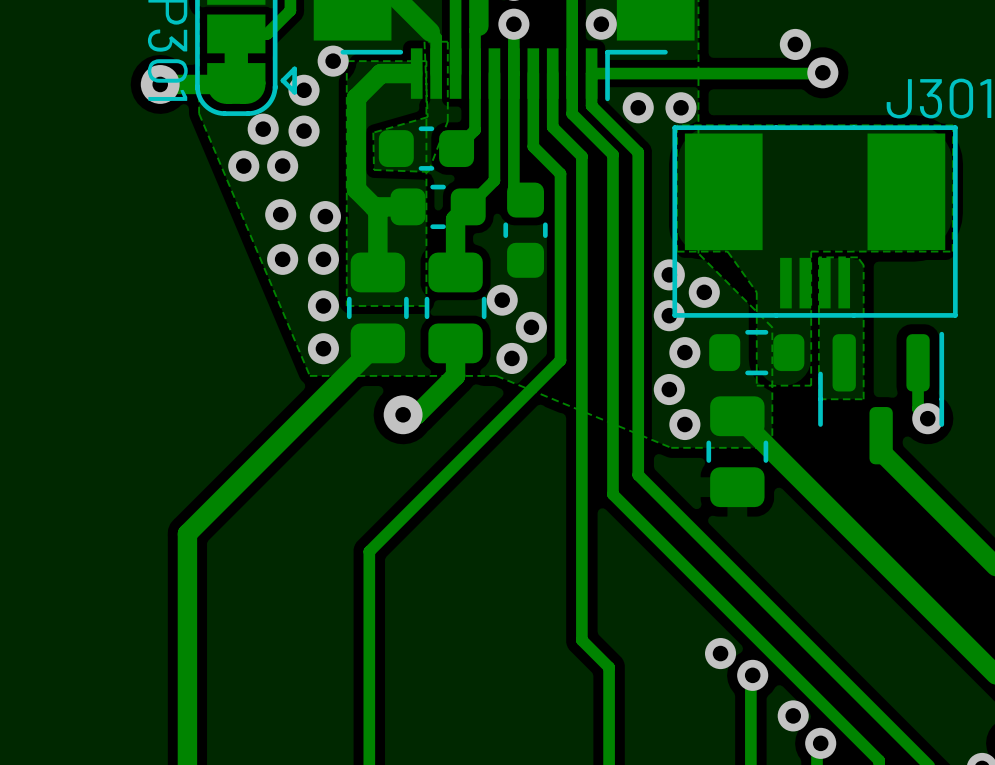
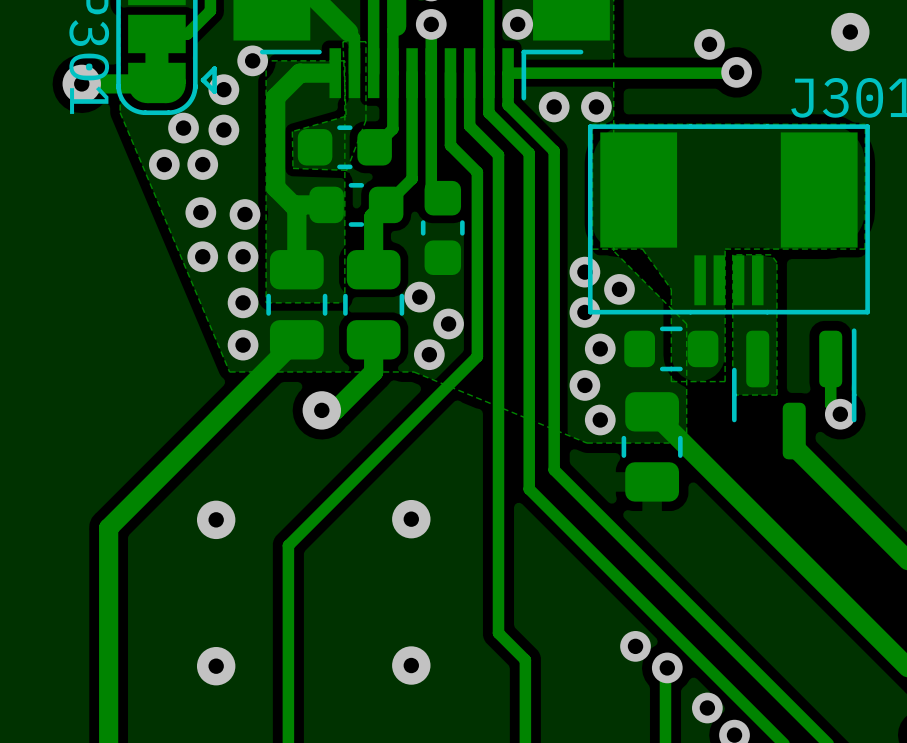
via: none -> (850, 32)
via: none -> (411, 519)
via: none -> (216, 519)
via: none -> (411, 665)
via: none -> (216, 666)

